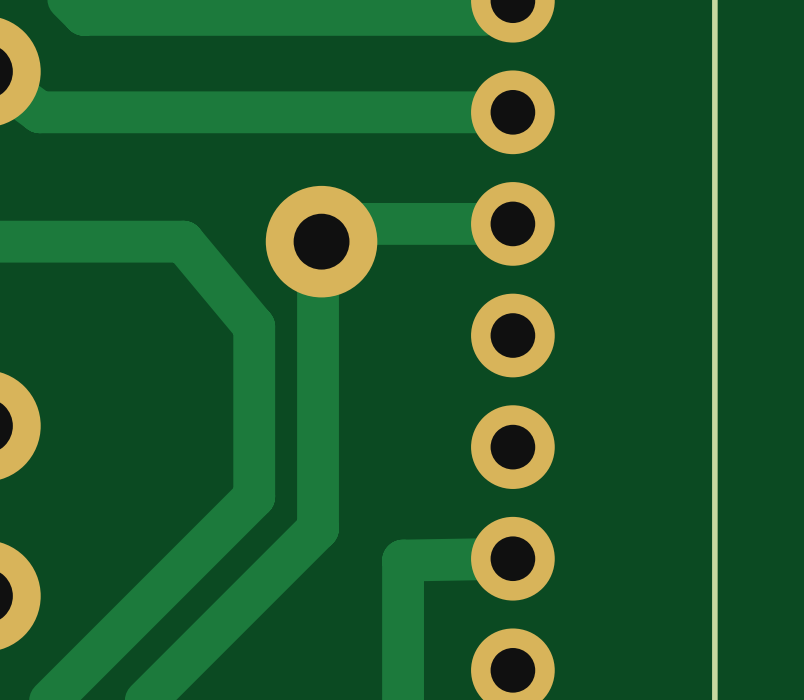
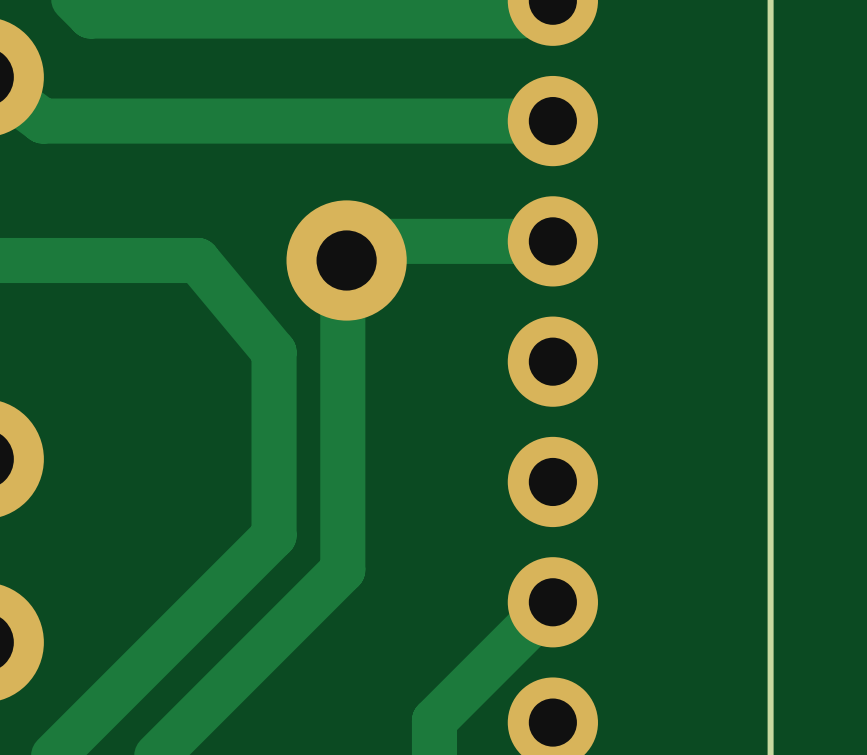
track: (512, 558) (403, 560) (403, 668) -> (552, 602) (434, 720)

